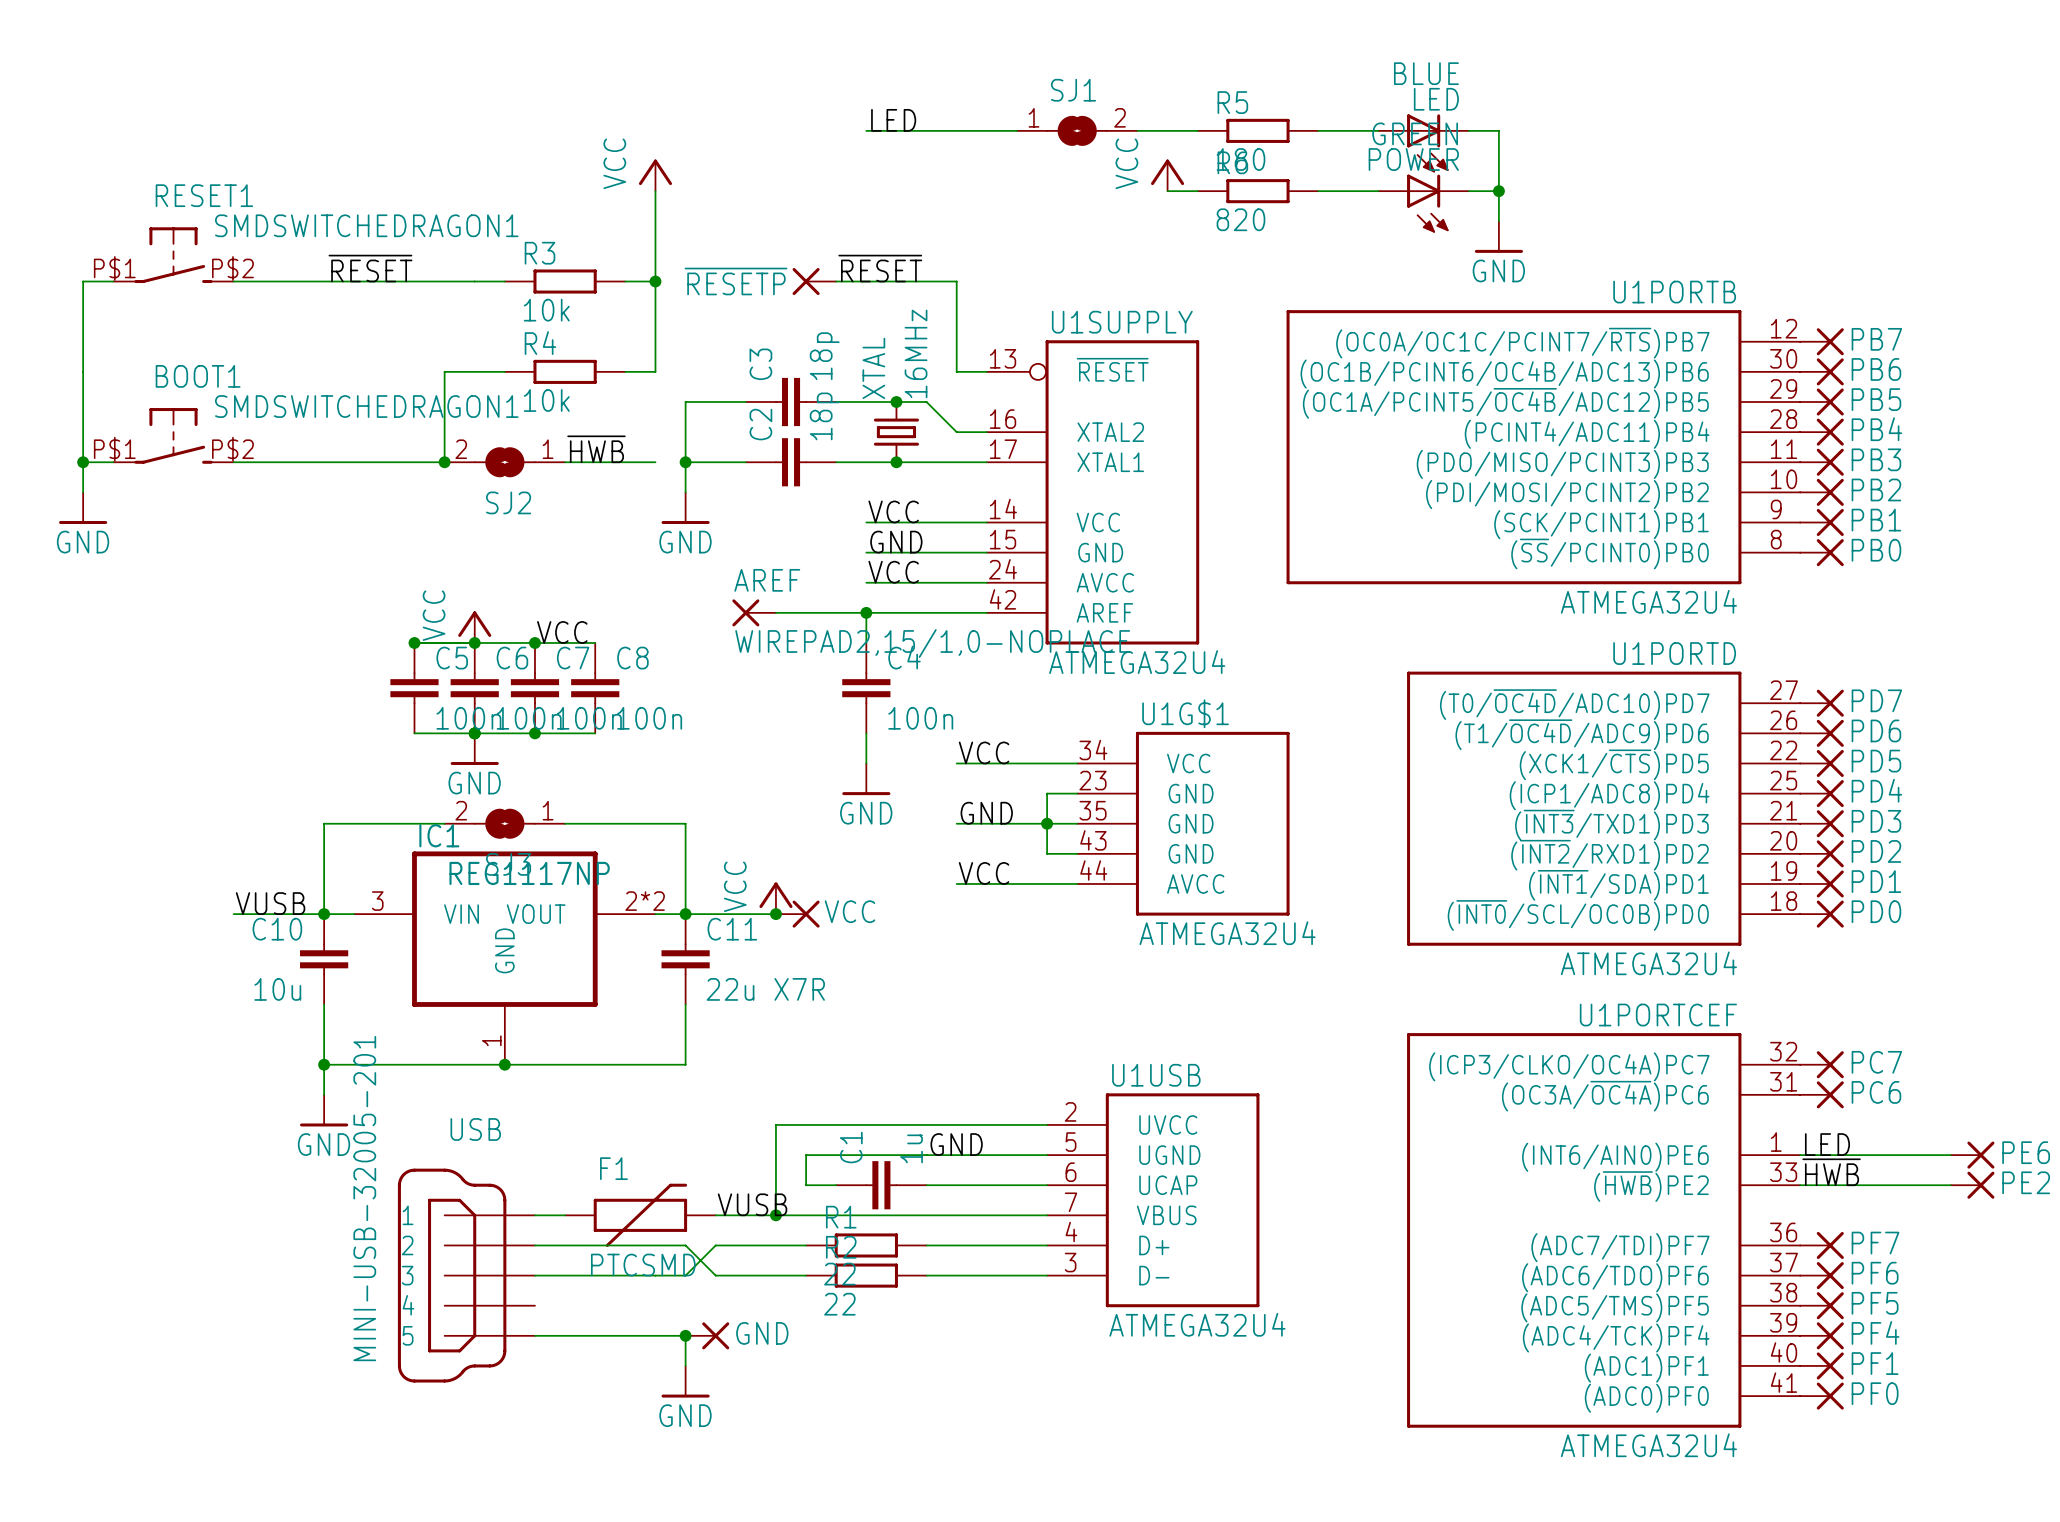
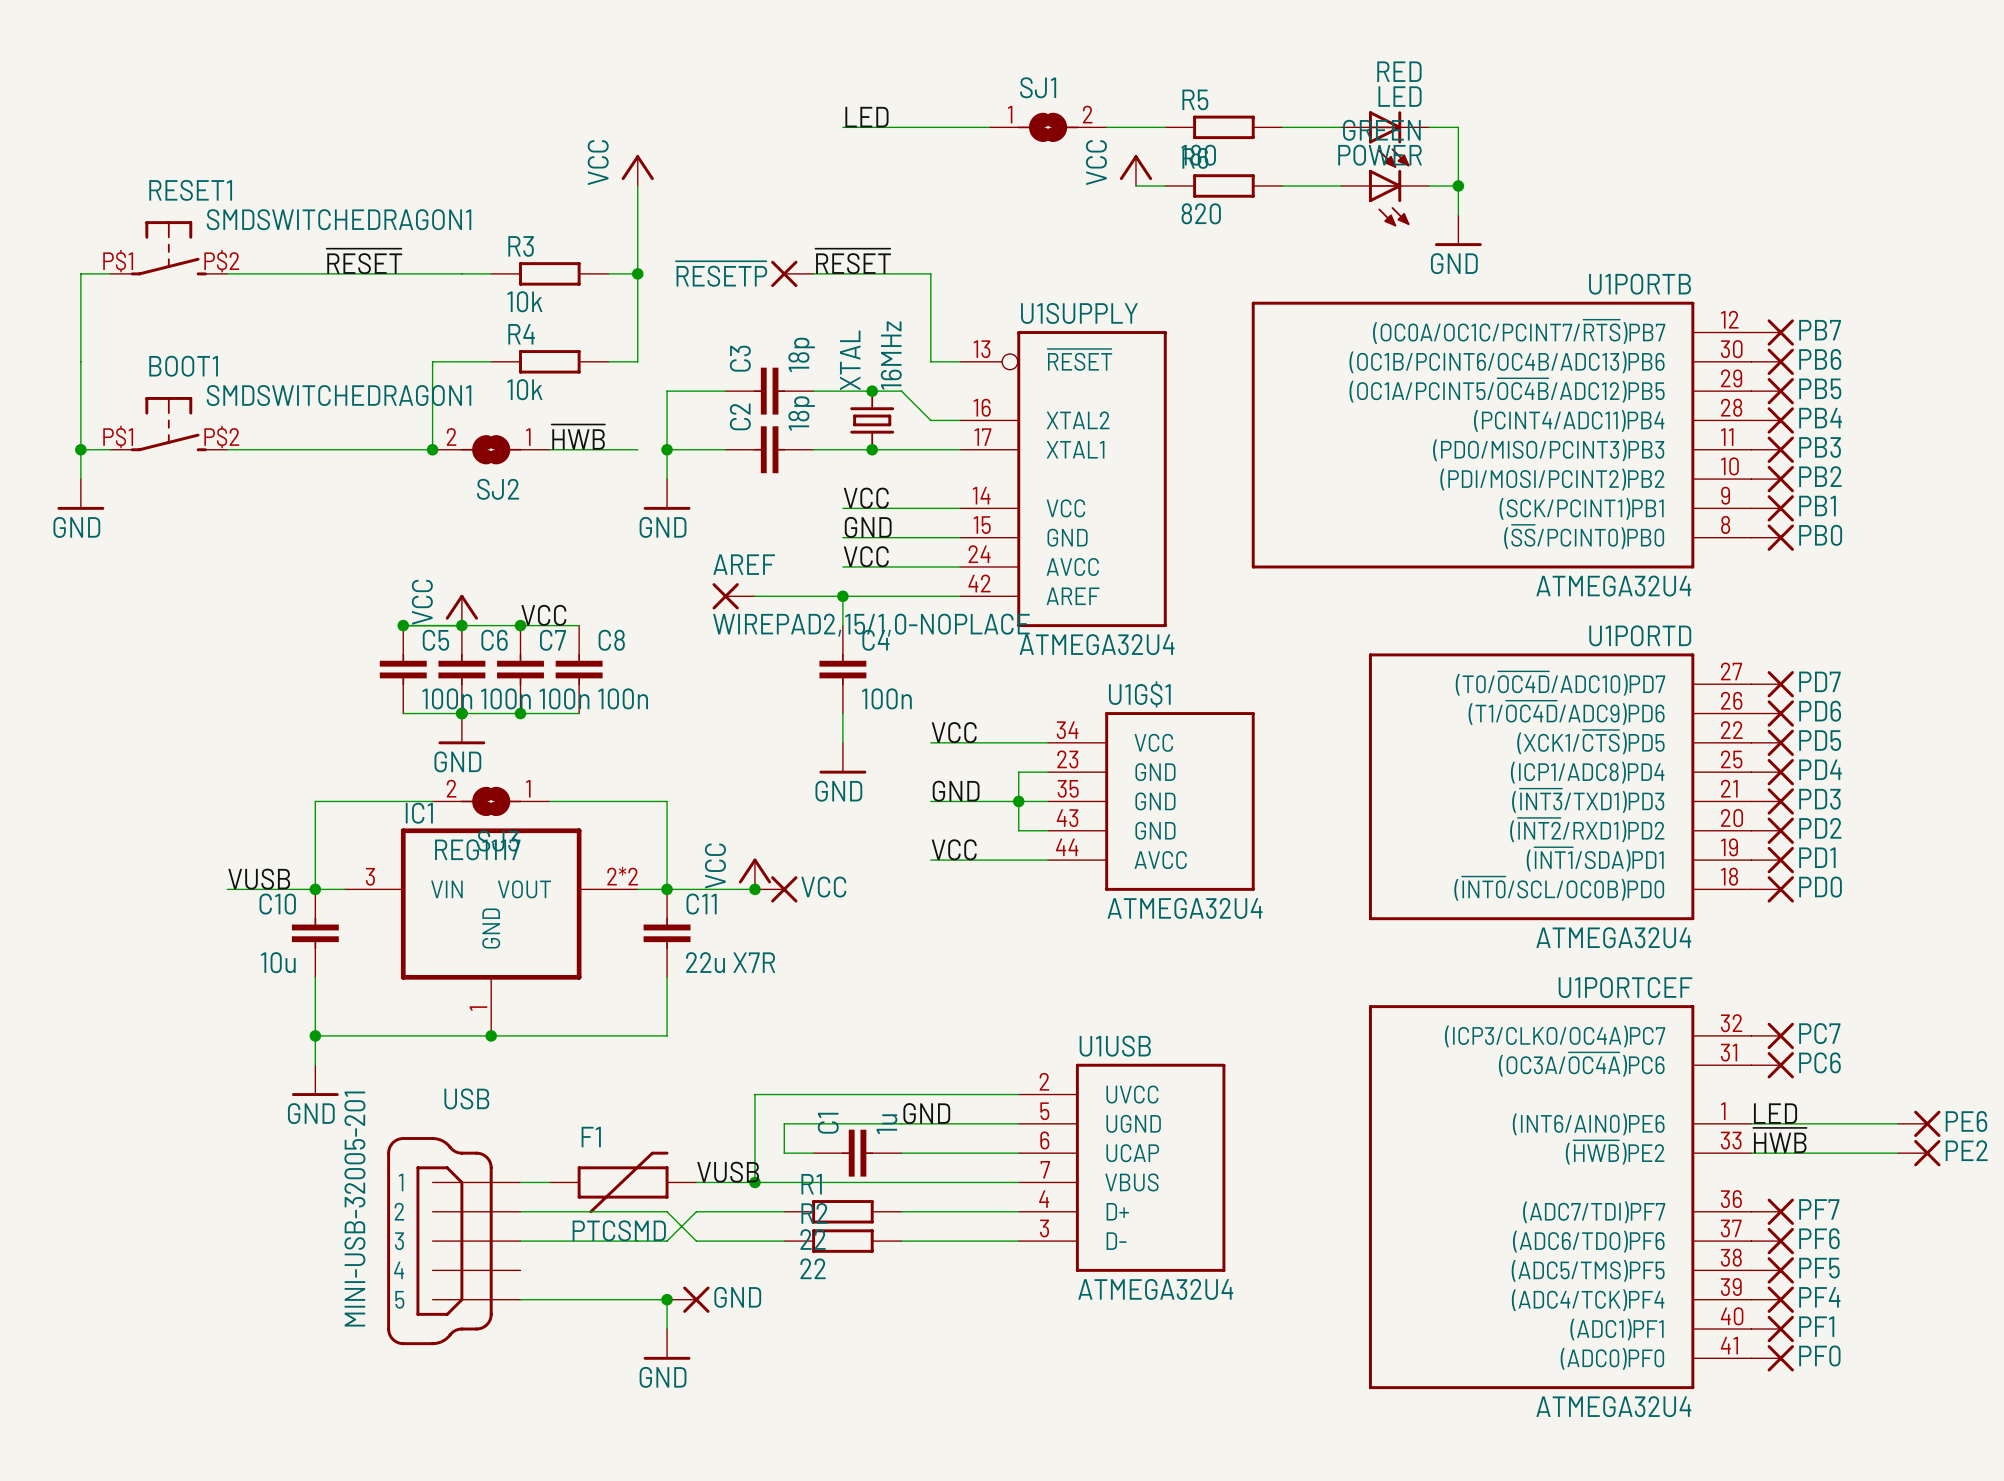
LED value: BLUE (1426, 73) -> RED (1399, 71)
IC1 value: REG1117NP (529, 873) -> REG1117 (477, 849)

